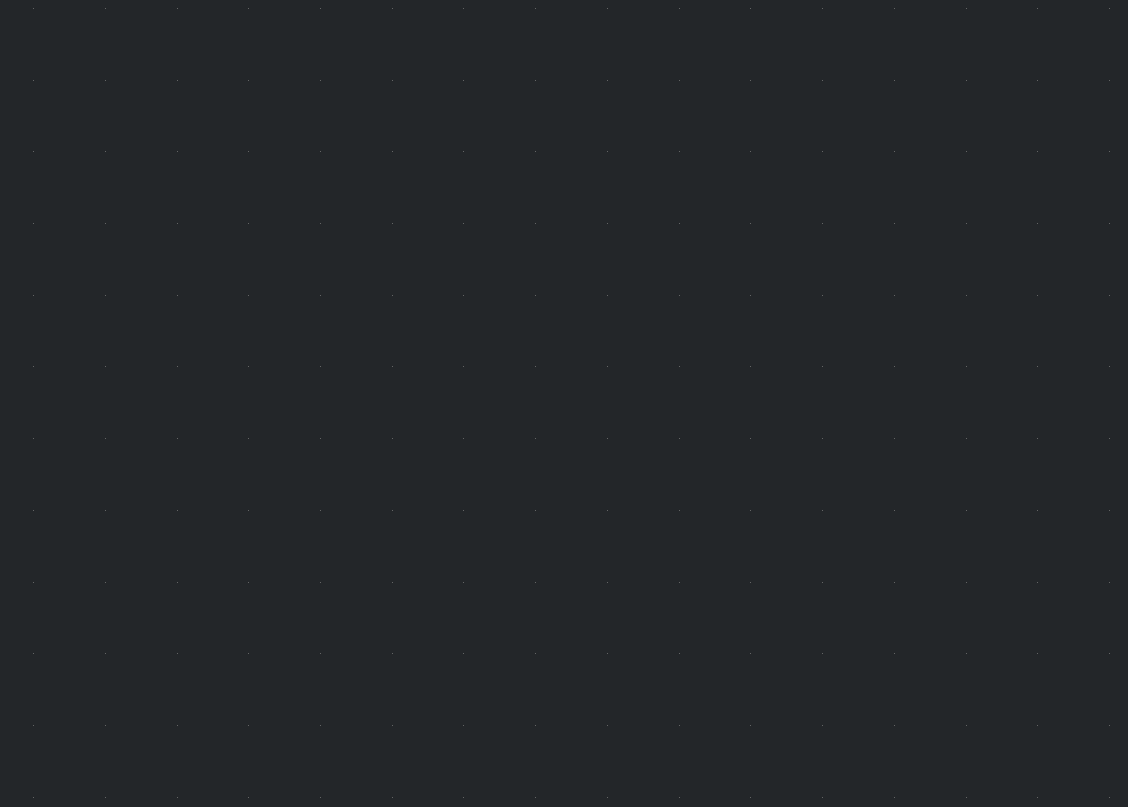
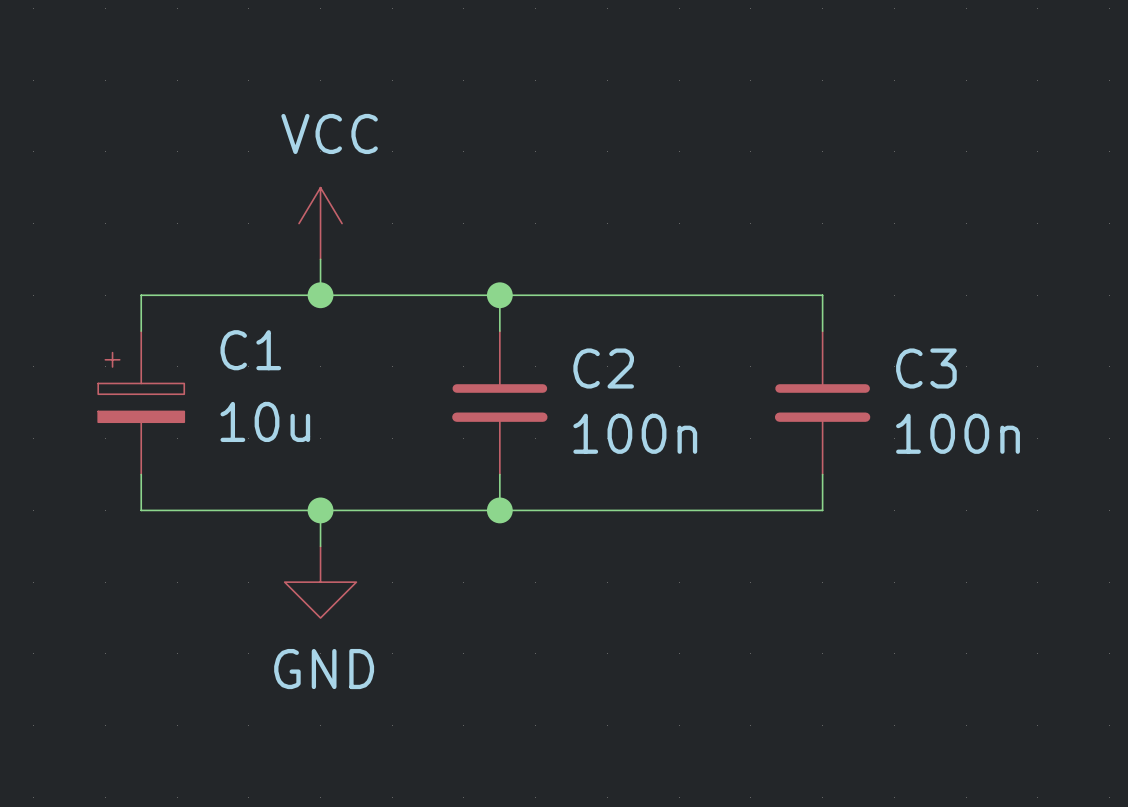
power symbol: none -> VCC (320, 223)
wire: none -> (320, 259) (320, 295)
junction: none -> (320, 295)
wire: none -> (499, 295) (499, 331)
junction: none -> (499, 295)
wire: none -> (141, 331) (141, 295) (822, 295) (822, 331)
C1: none -> 10u (141, 402)
C2: none -> 100n (499, 402)
C3: none -> 100n (822, 402)
wire: none -> (141, 474) (141, 510) (822, 510) (822, 474)
wire: none -> (499, 474) (499, 510)
wire: none -> (320, 510) (320, 546)
junction: none -> (320, 510)
junction: none -> (499, 510)
power symbol: none -> GND (320, 582)

